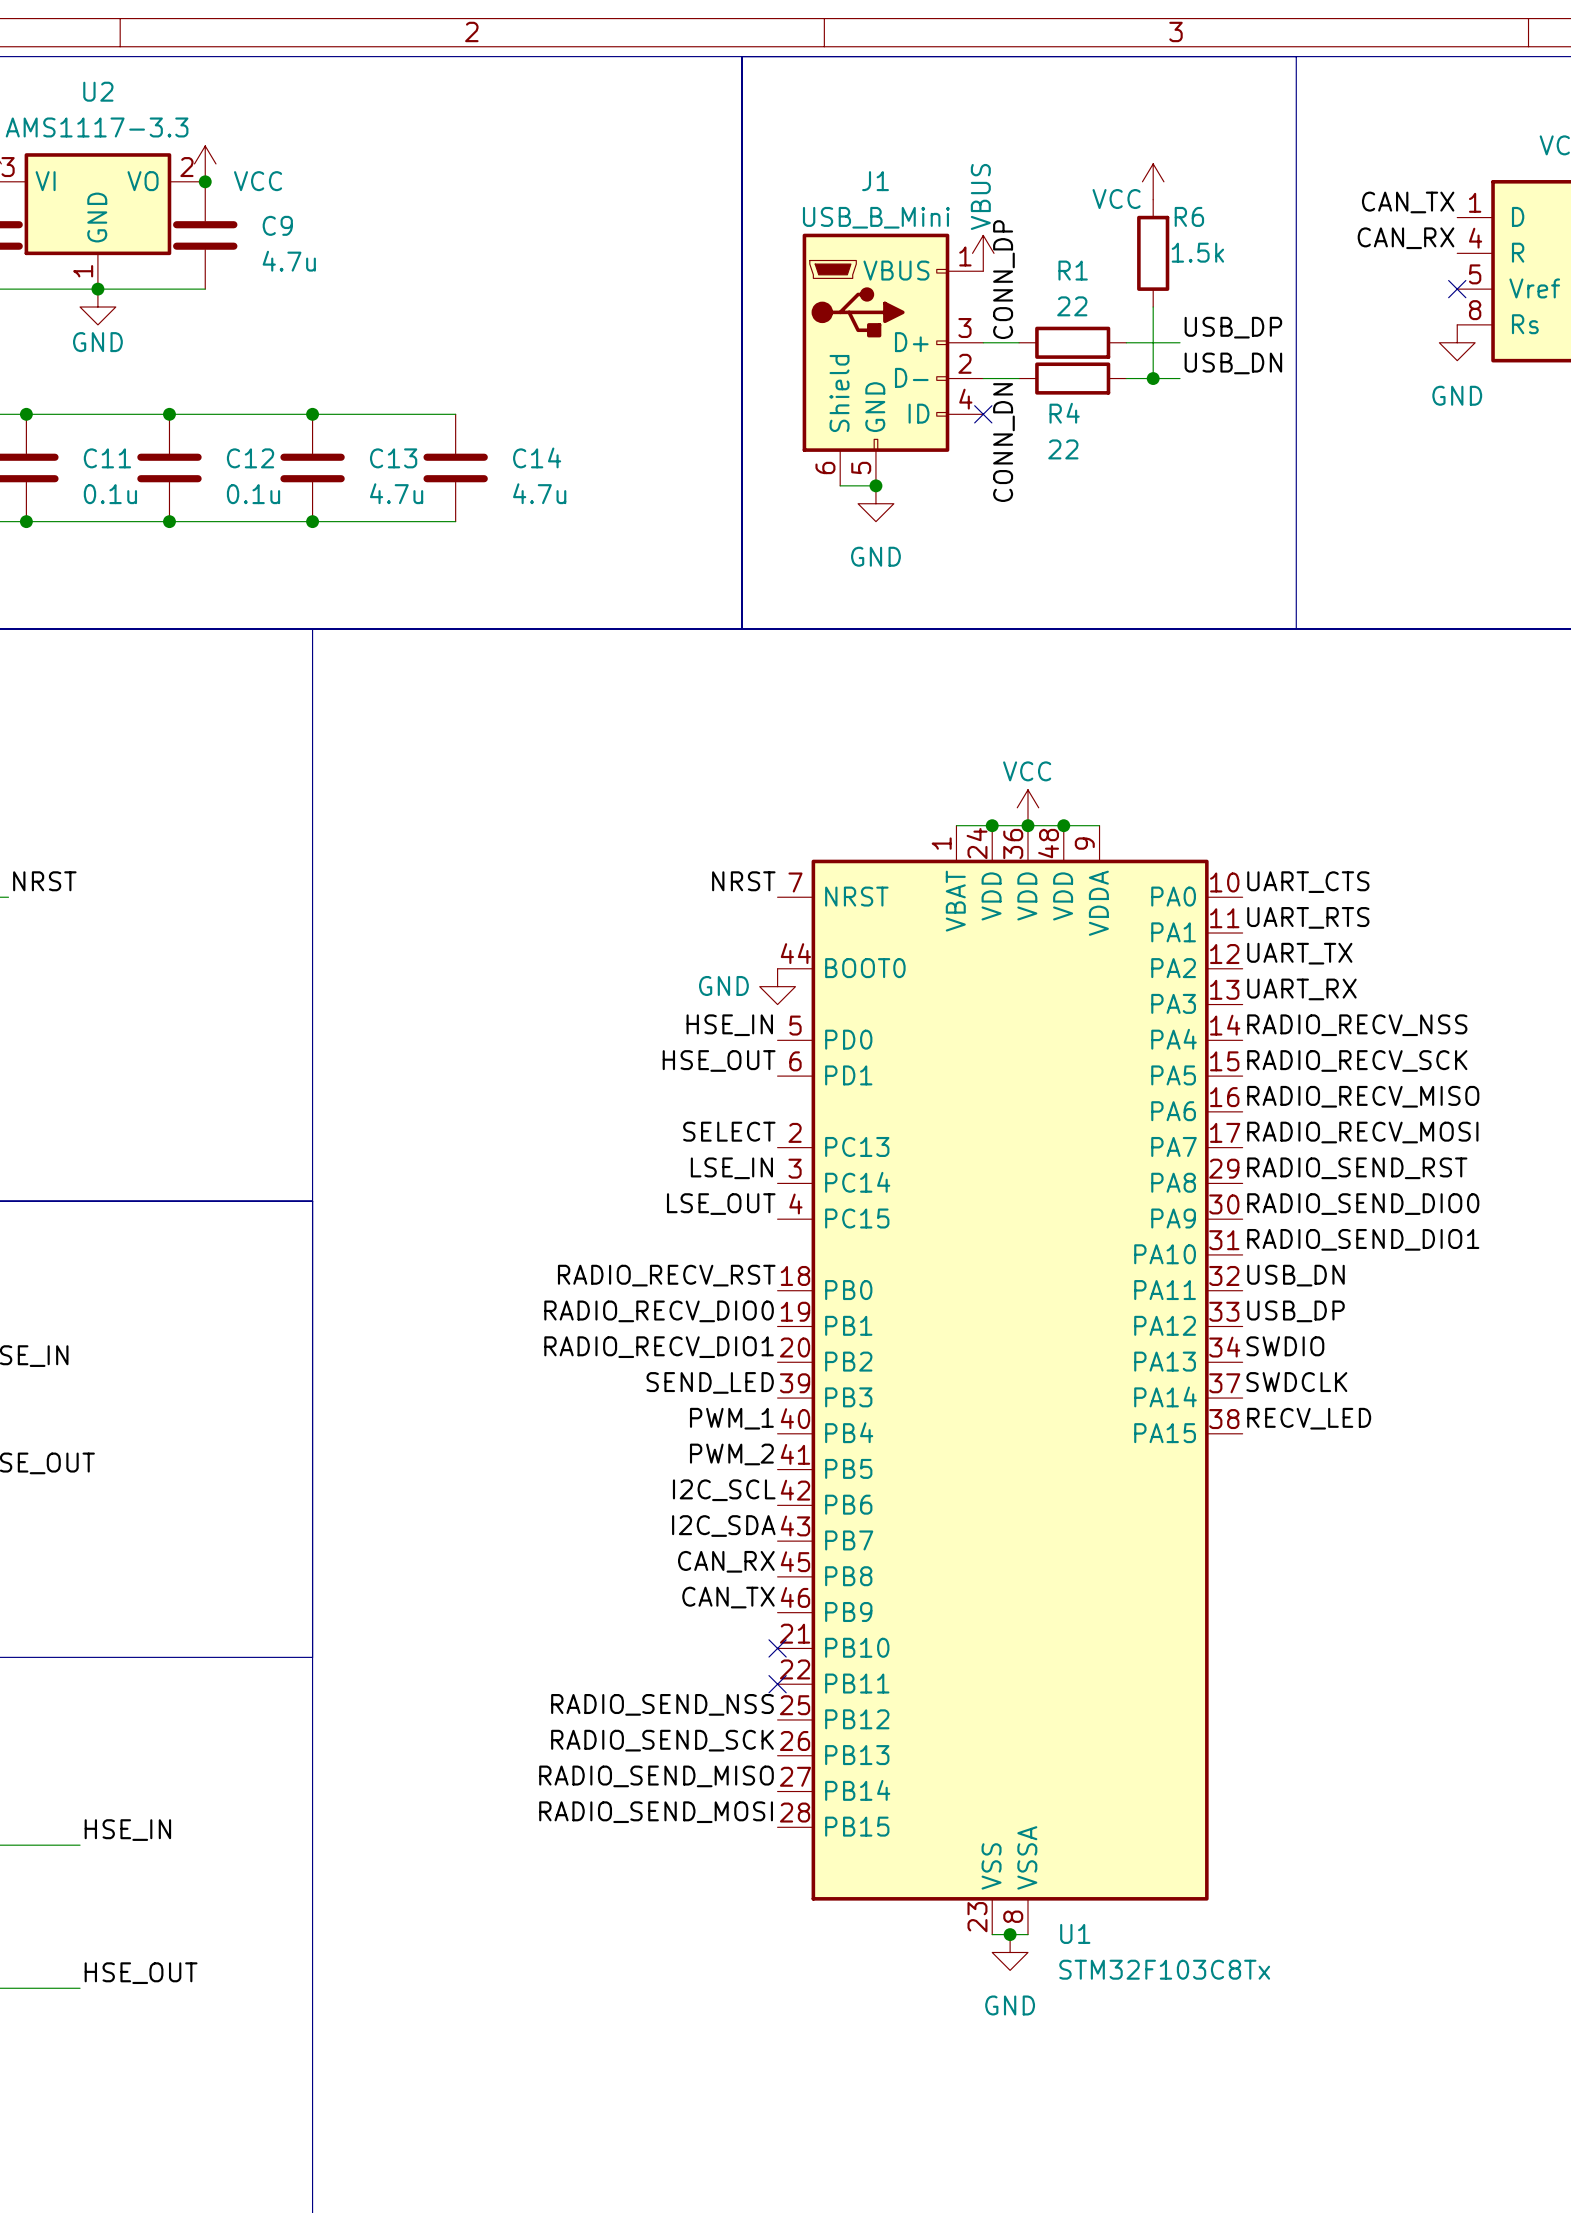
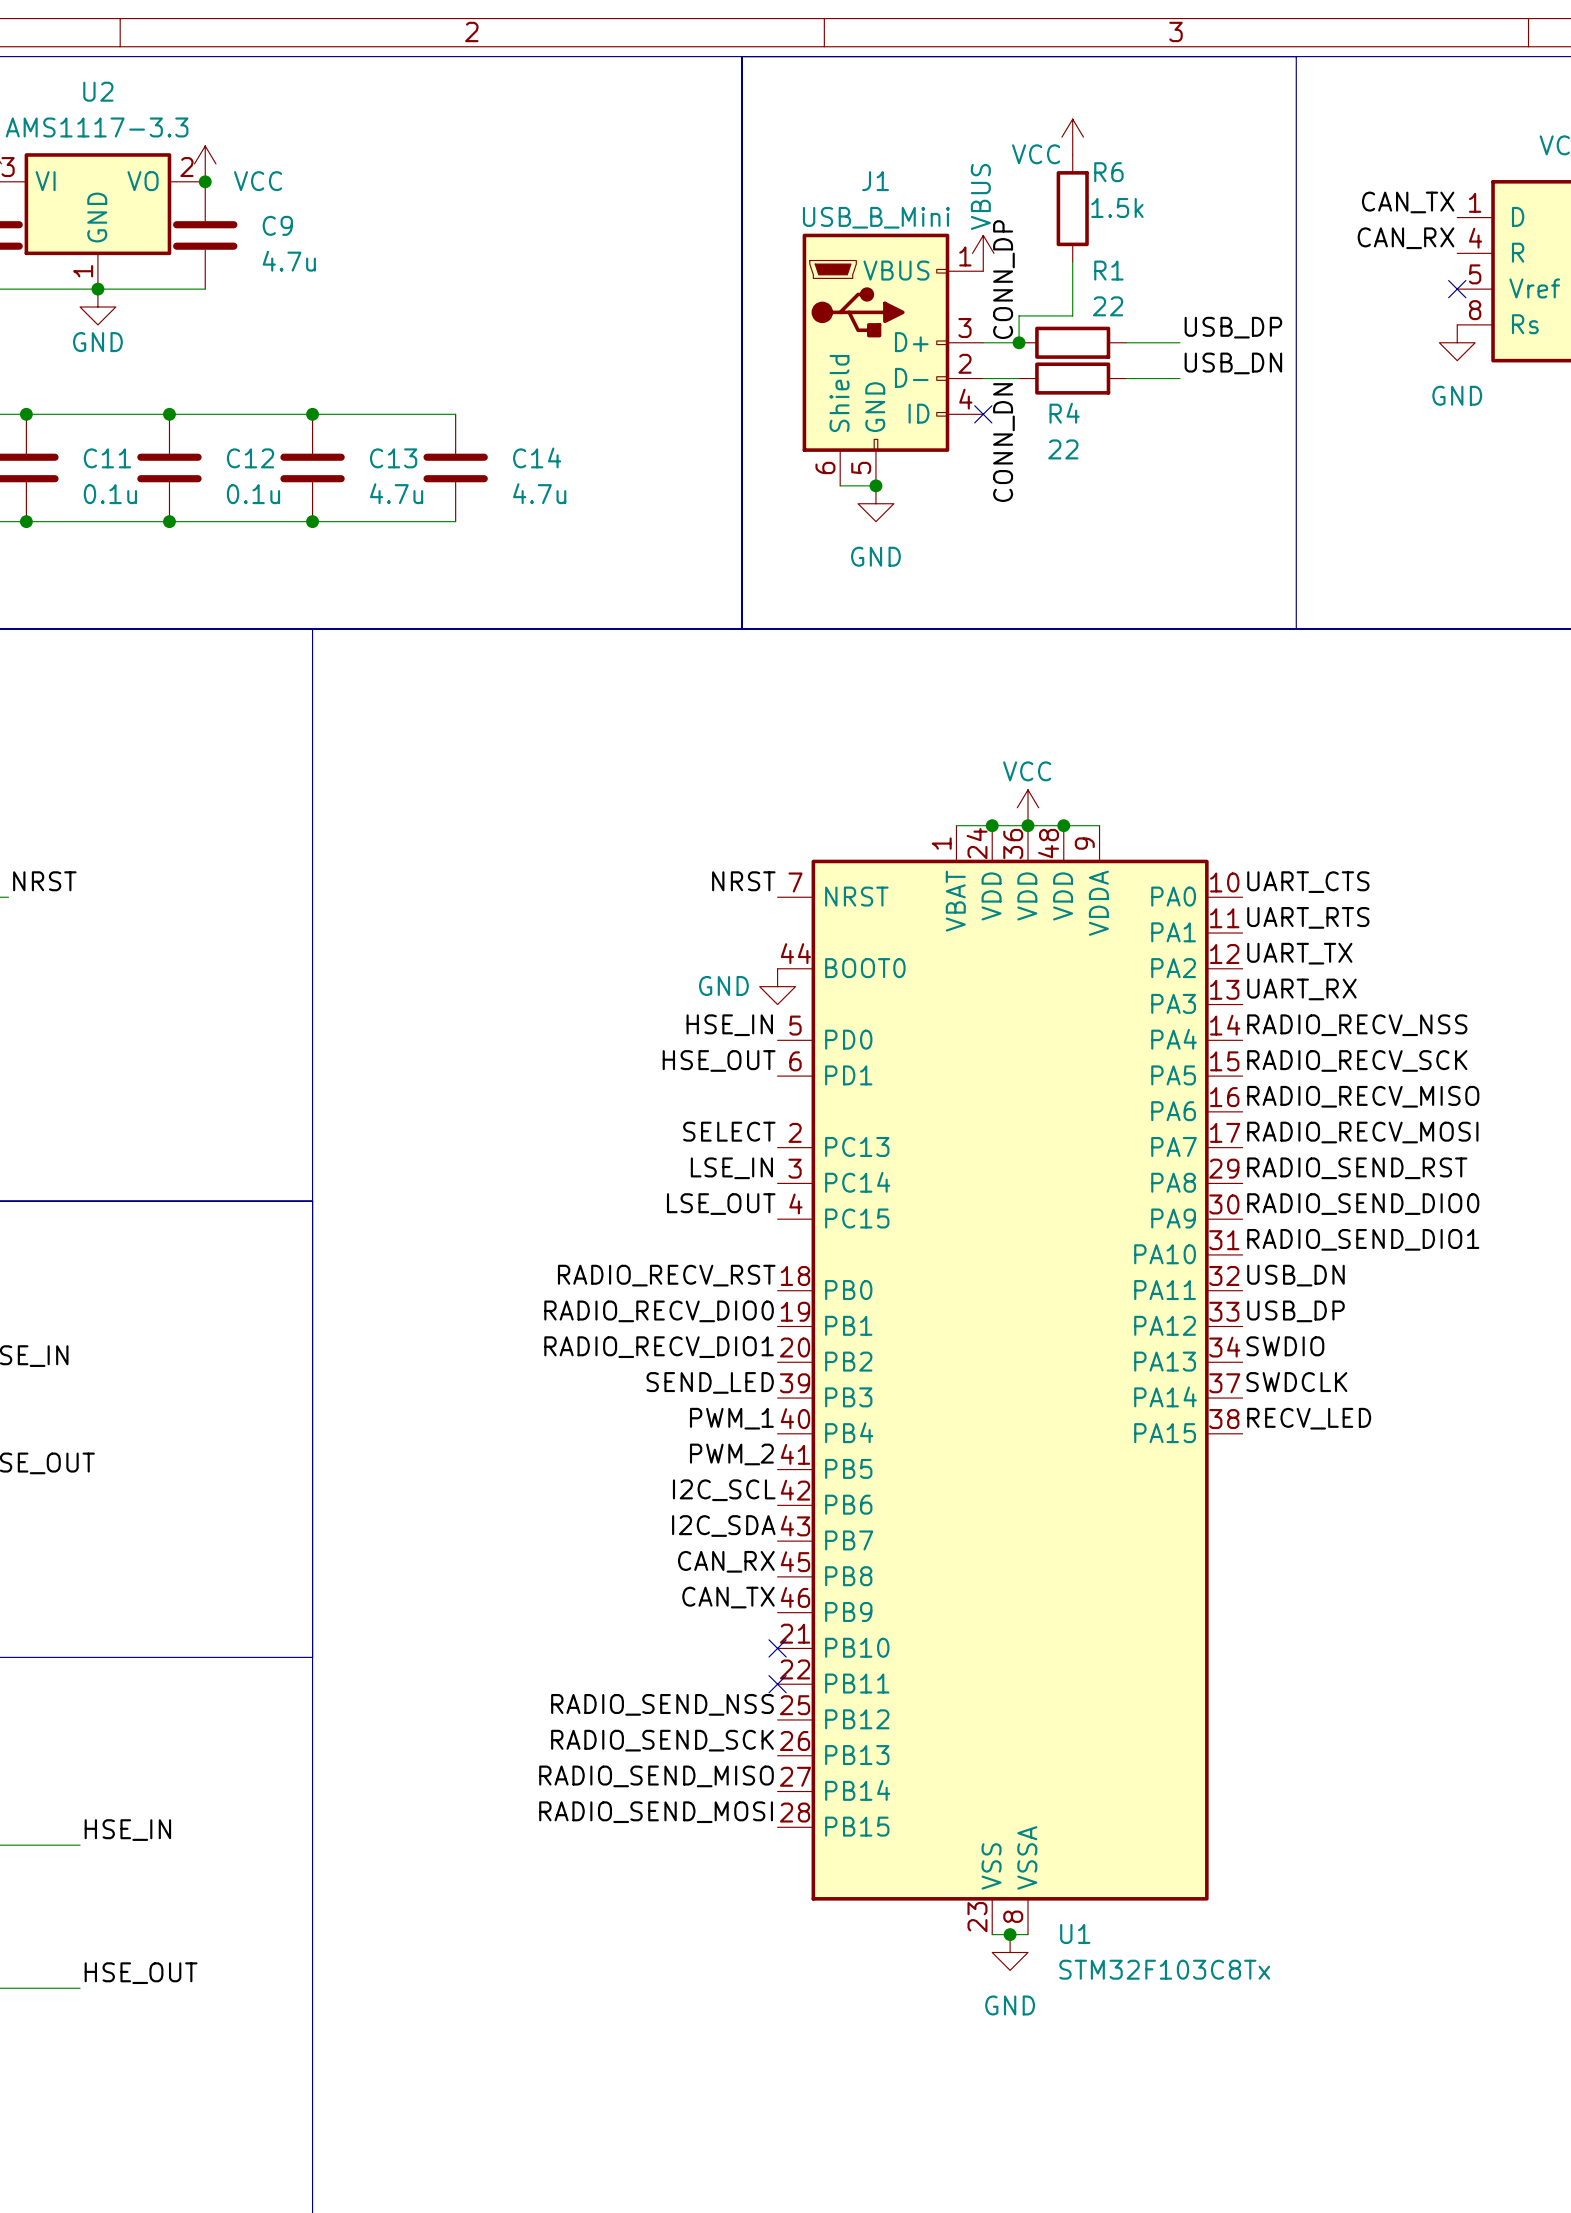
power symbol position: VCC (1153, 181) -> VCC (1072, 137)
R6 position: (1153, 253) -> (1072, 208)
wire: none -> (1072, 262) (1072, 315) (1019, 315) (1019, 342)
R1 name position: R1 (1073, 270) -> R1 (1108, 270)
R1 value position: 22 (1072, 306) -> 22 (1108, 306)
wire: (1153, 307) (1153, 378) -> none
junction: none -> (1019, 342)
junction: (1153, 378) -> none

